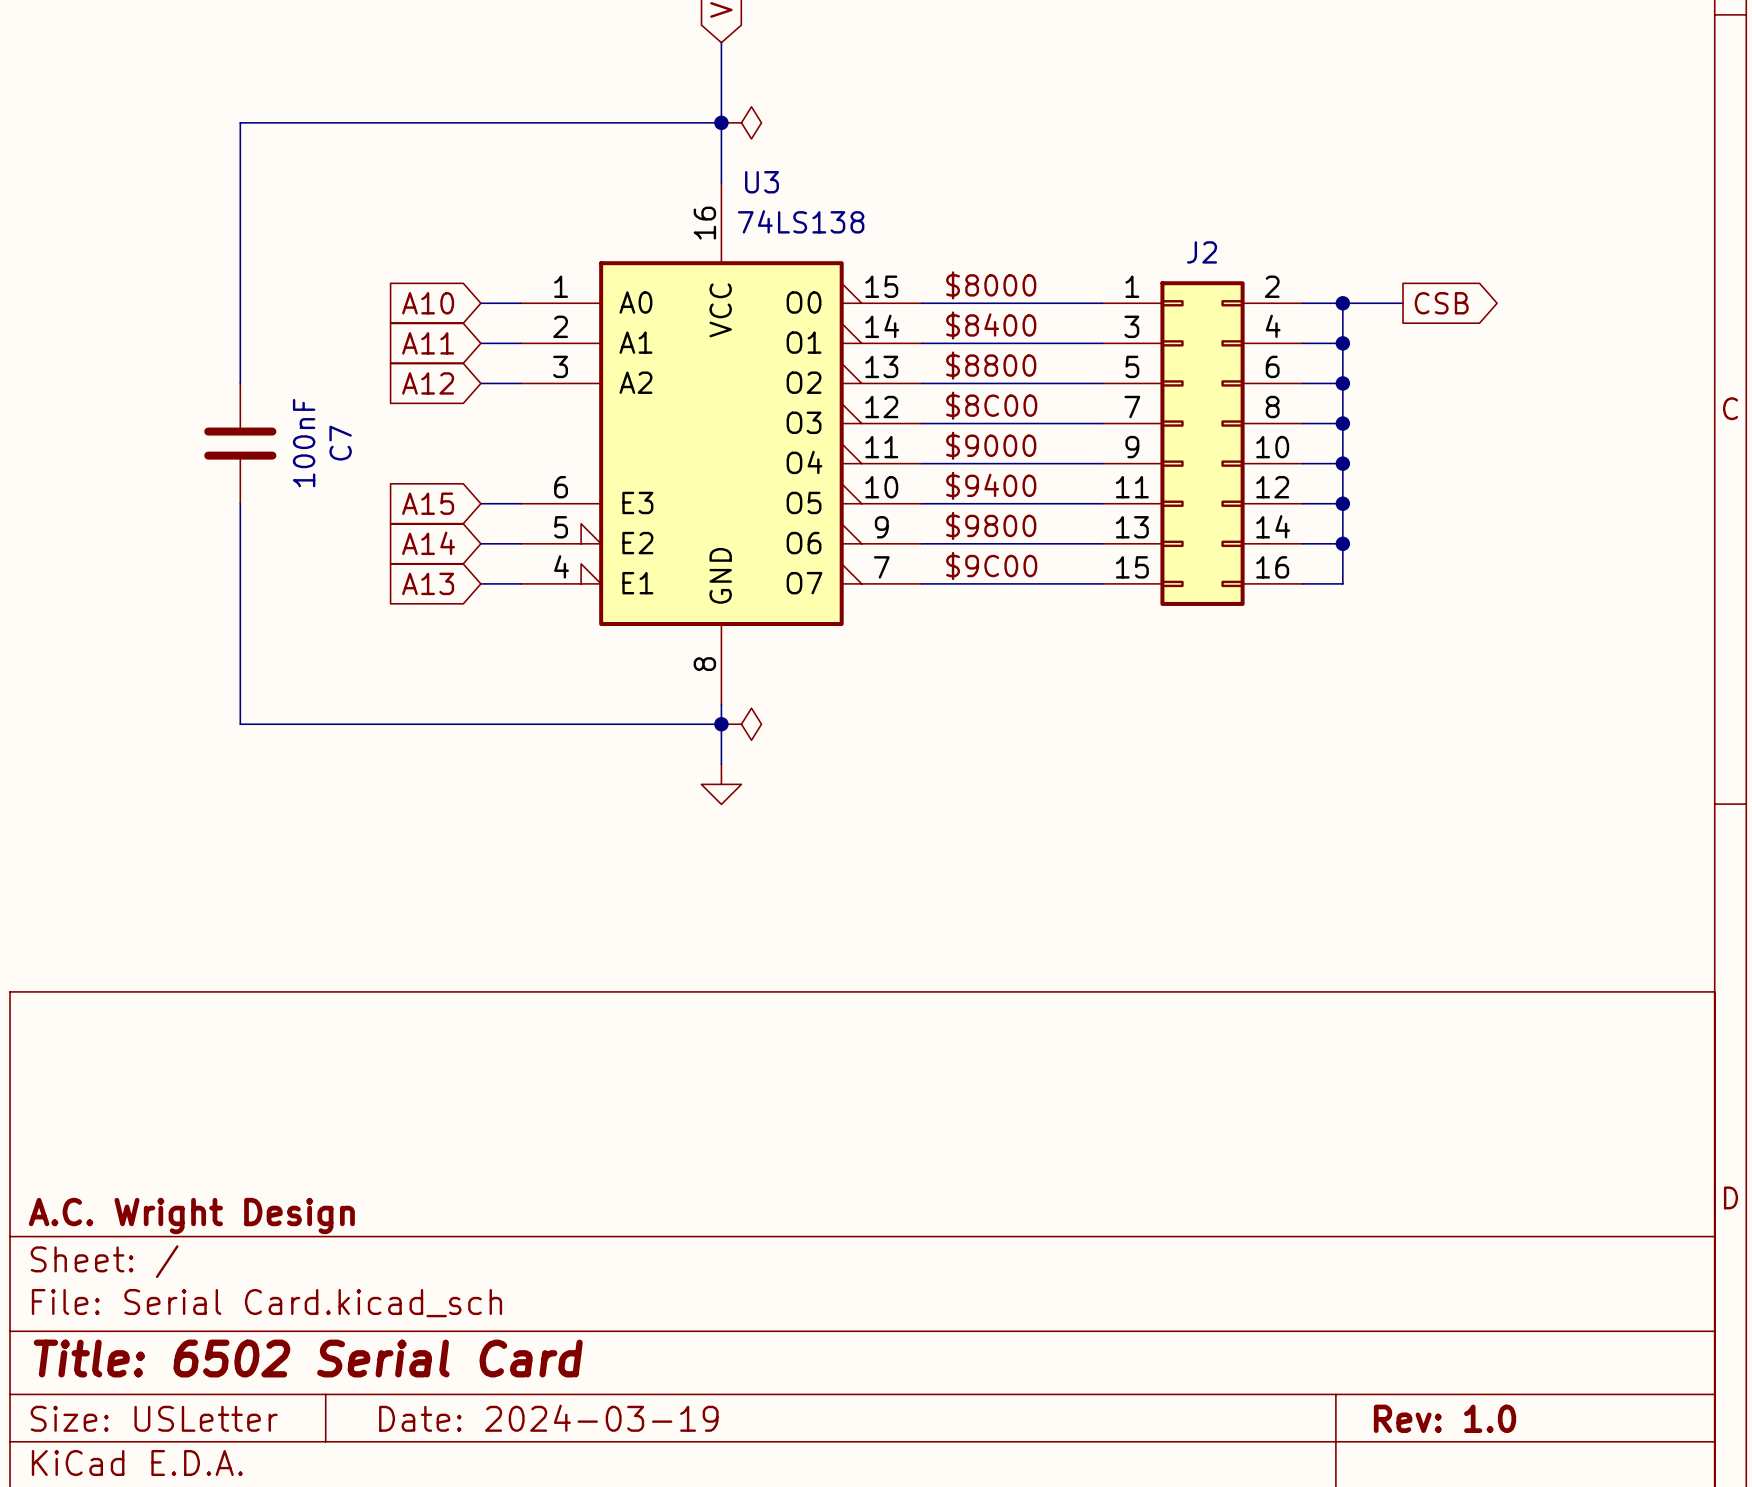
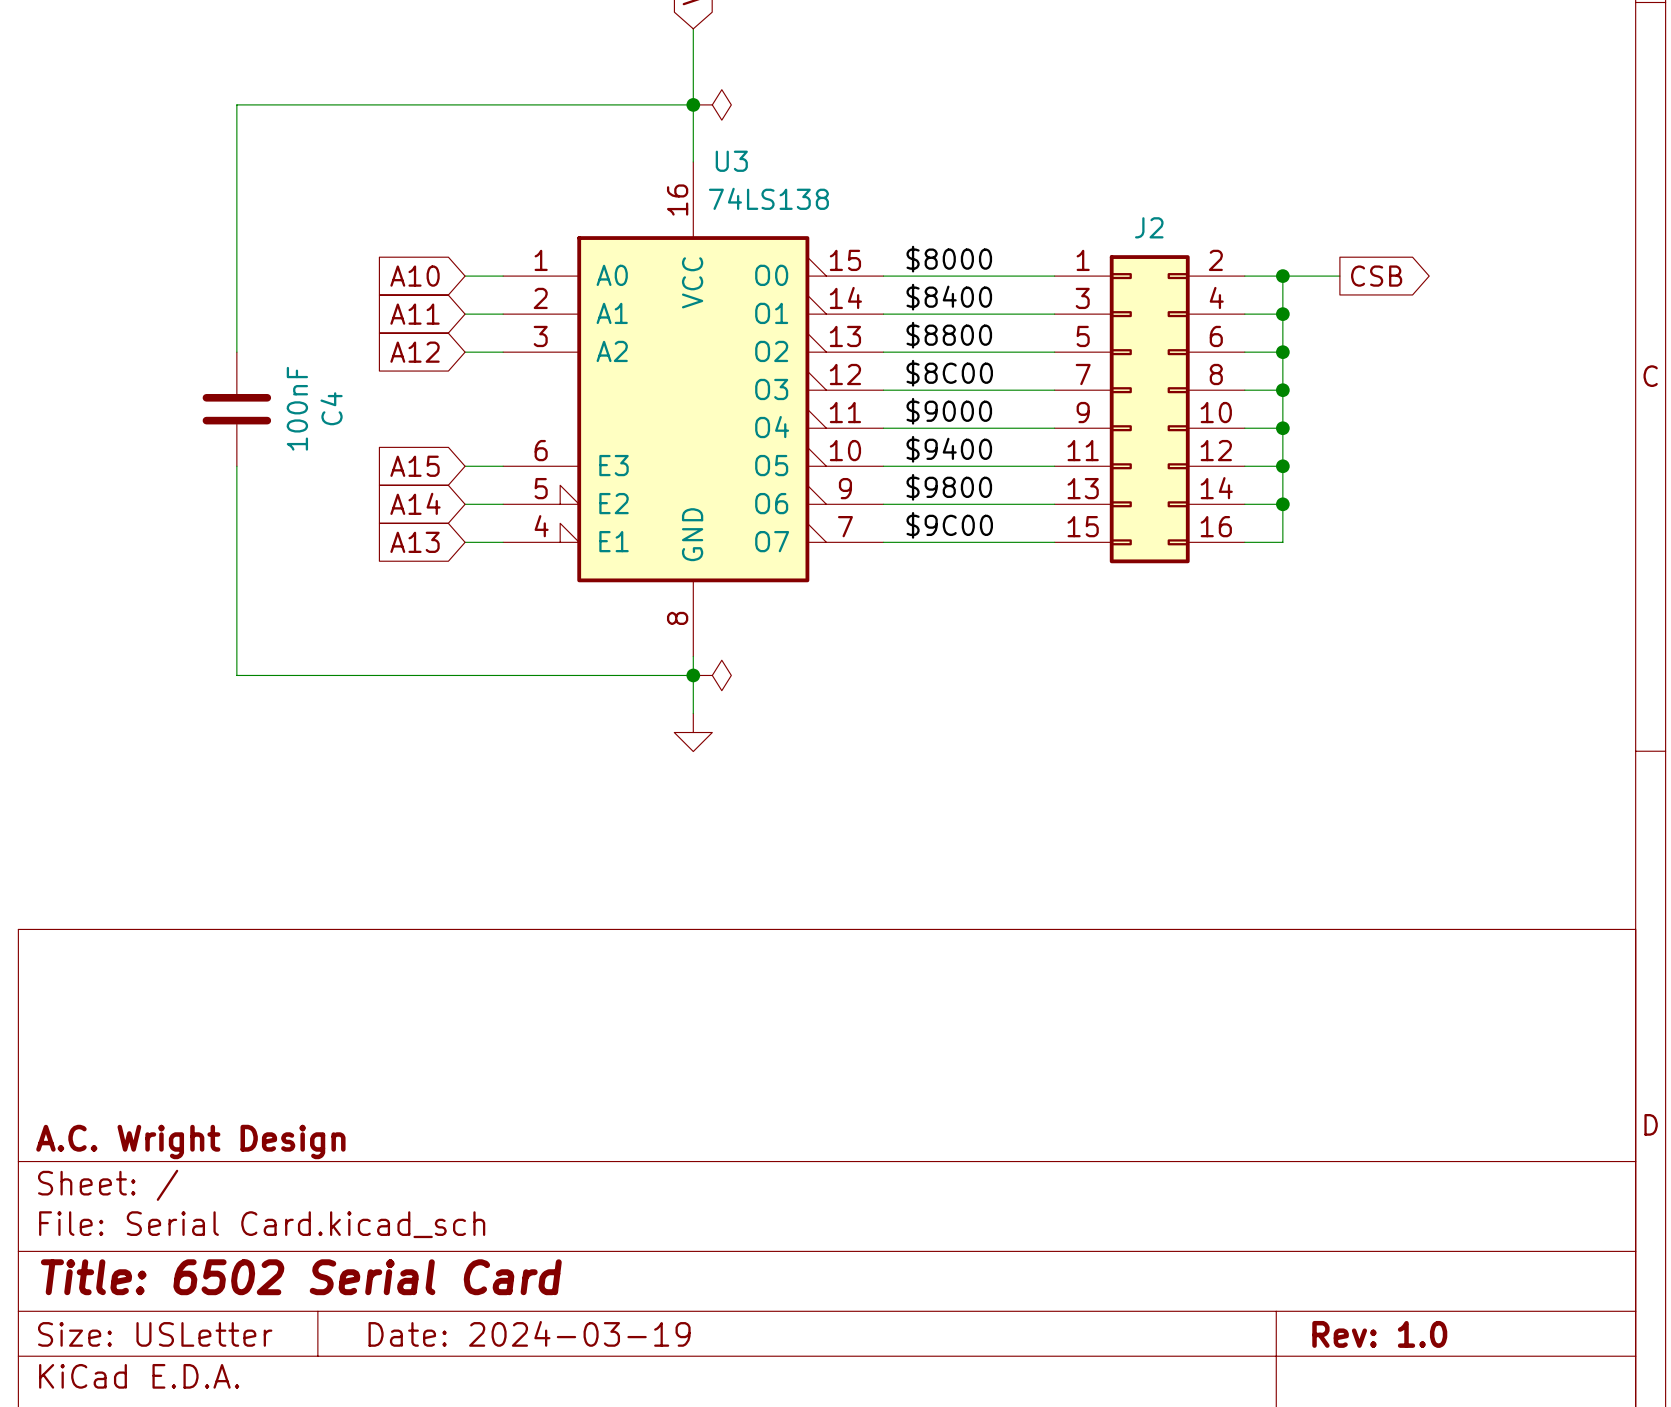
C7 name: C7 (340, 443) -> C4 (331, 408)

